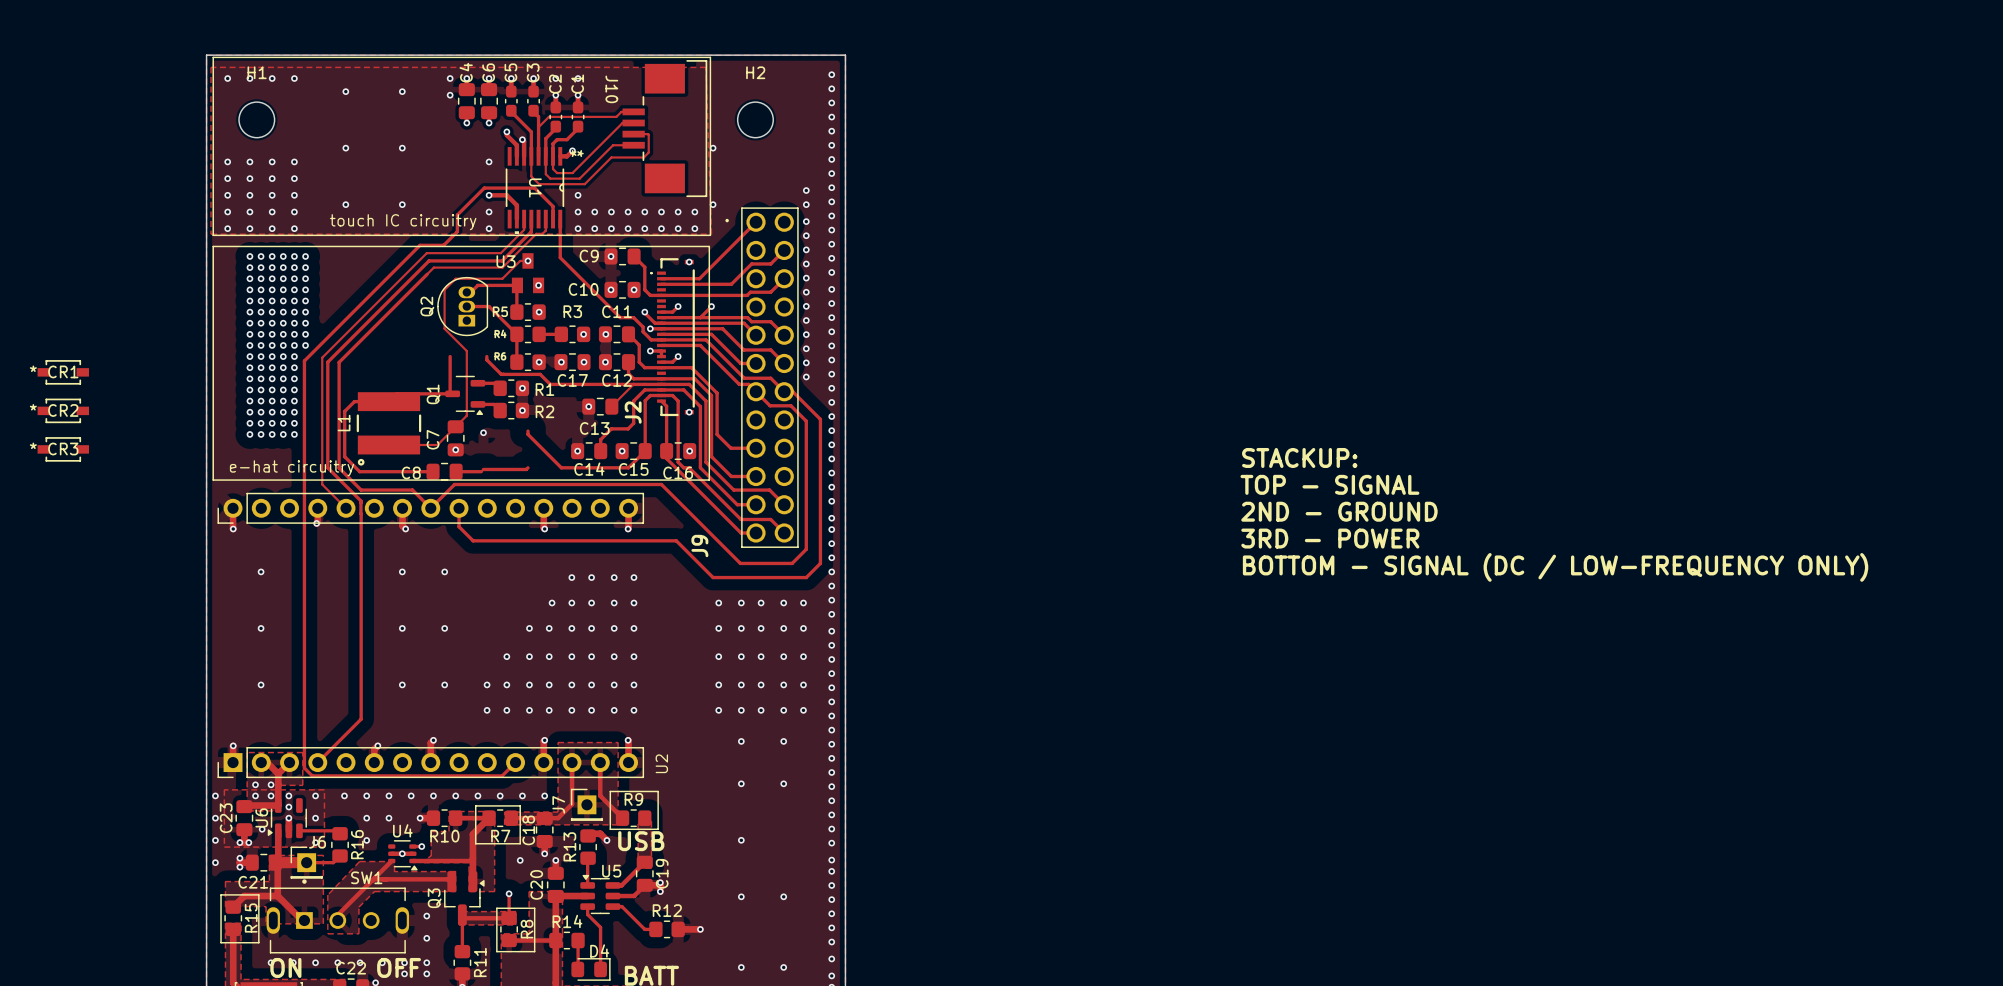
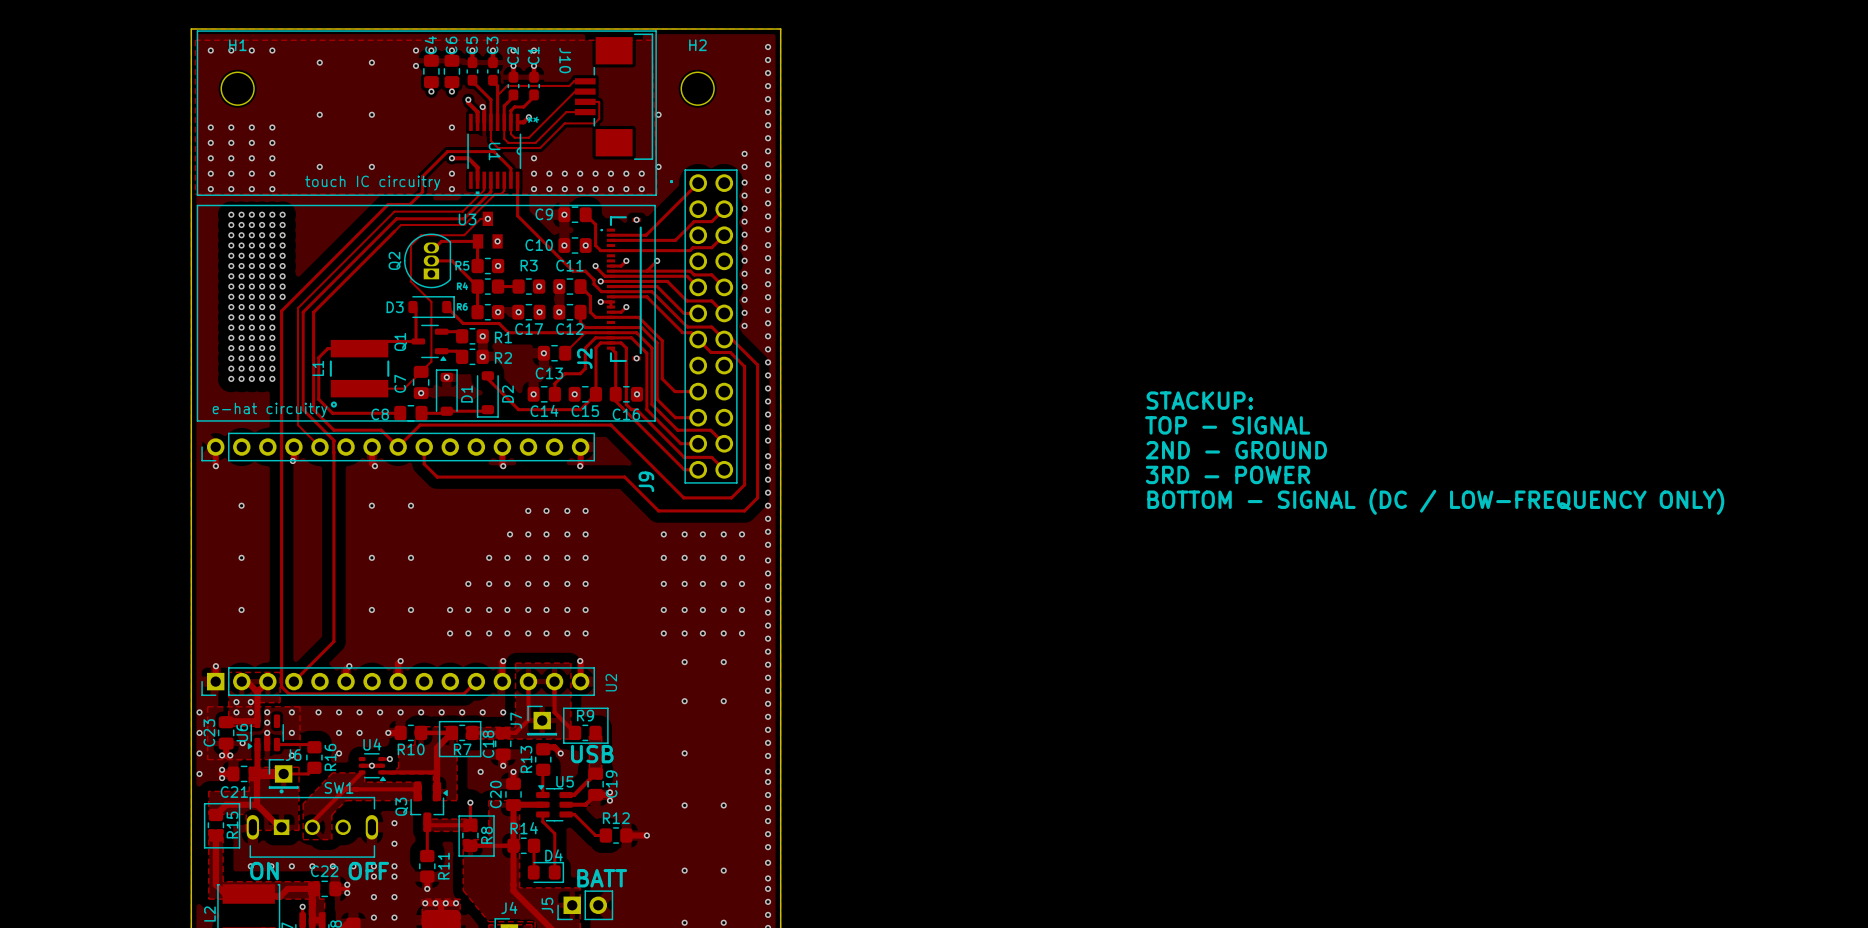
D3: none -> (431, 307)
CR1: (63, 372) -> none
CR2: (63, 410) -> none
CR3: (63, 449) -> none
D1: none -> (446, 392)
D2: none -> (487, 394)

